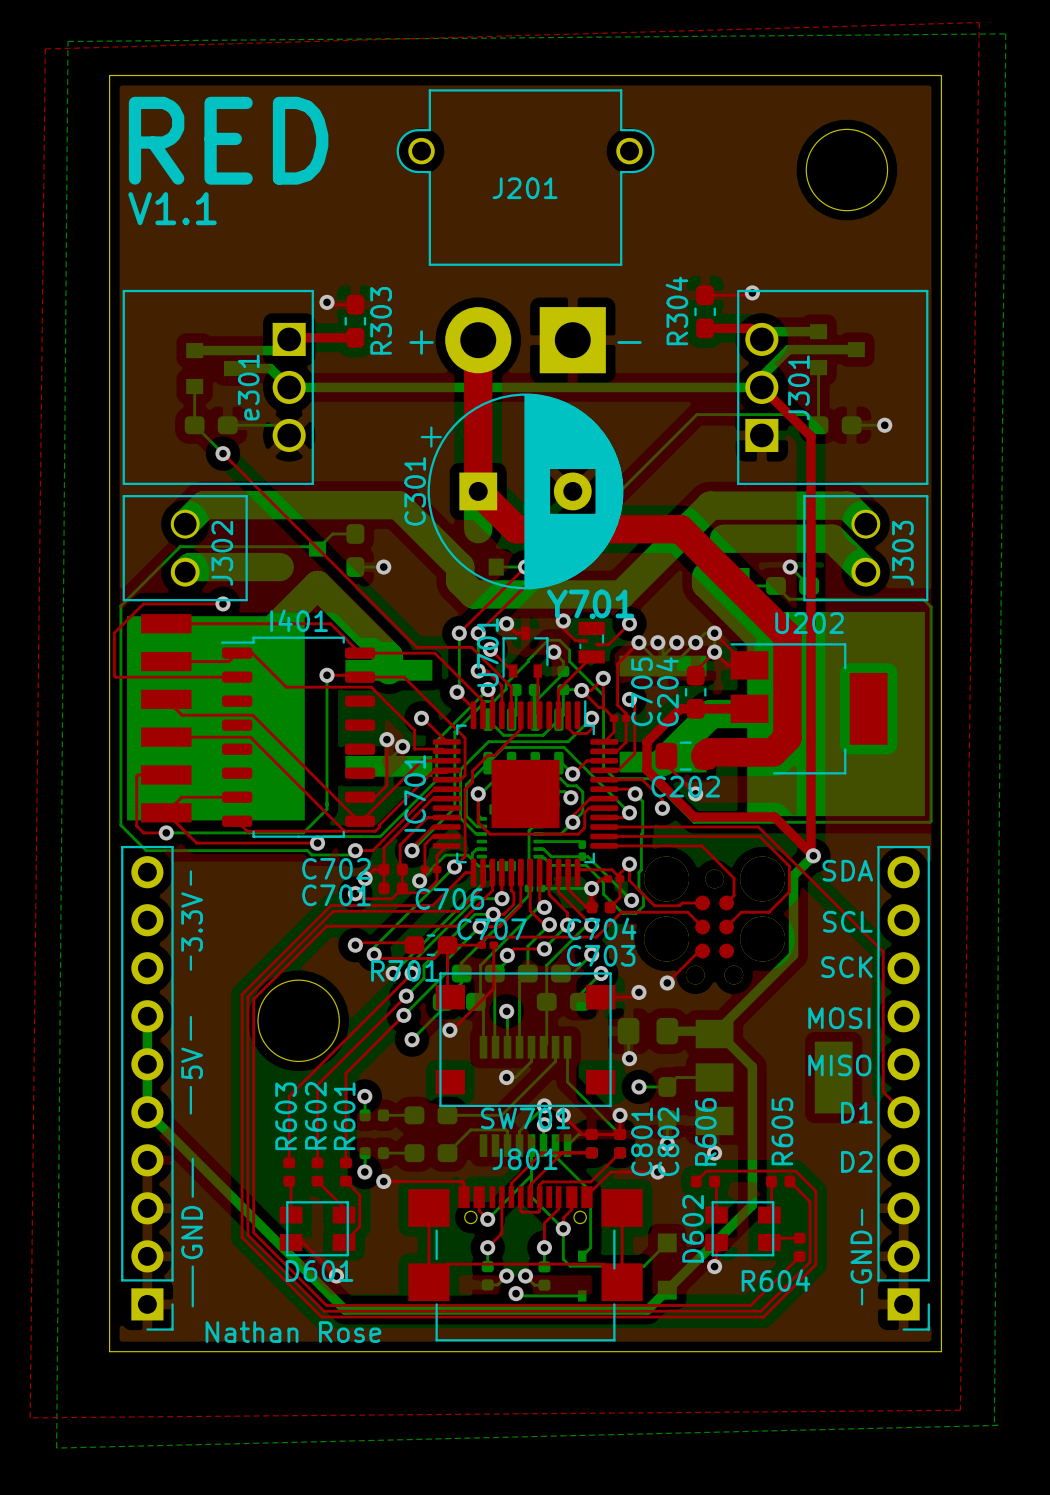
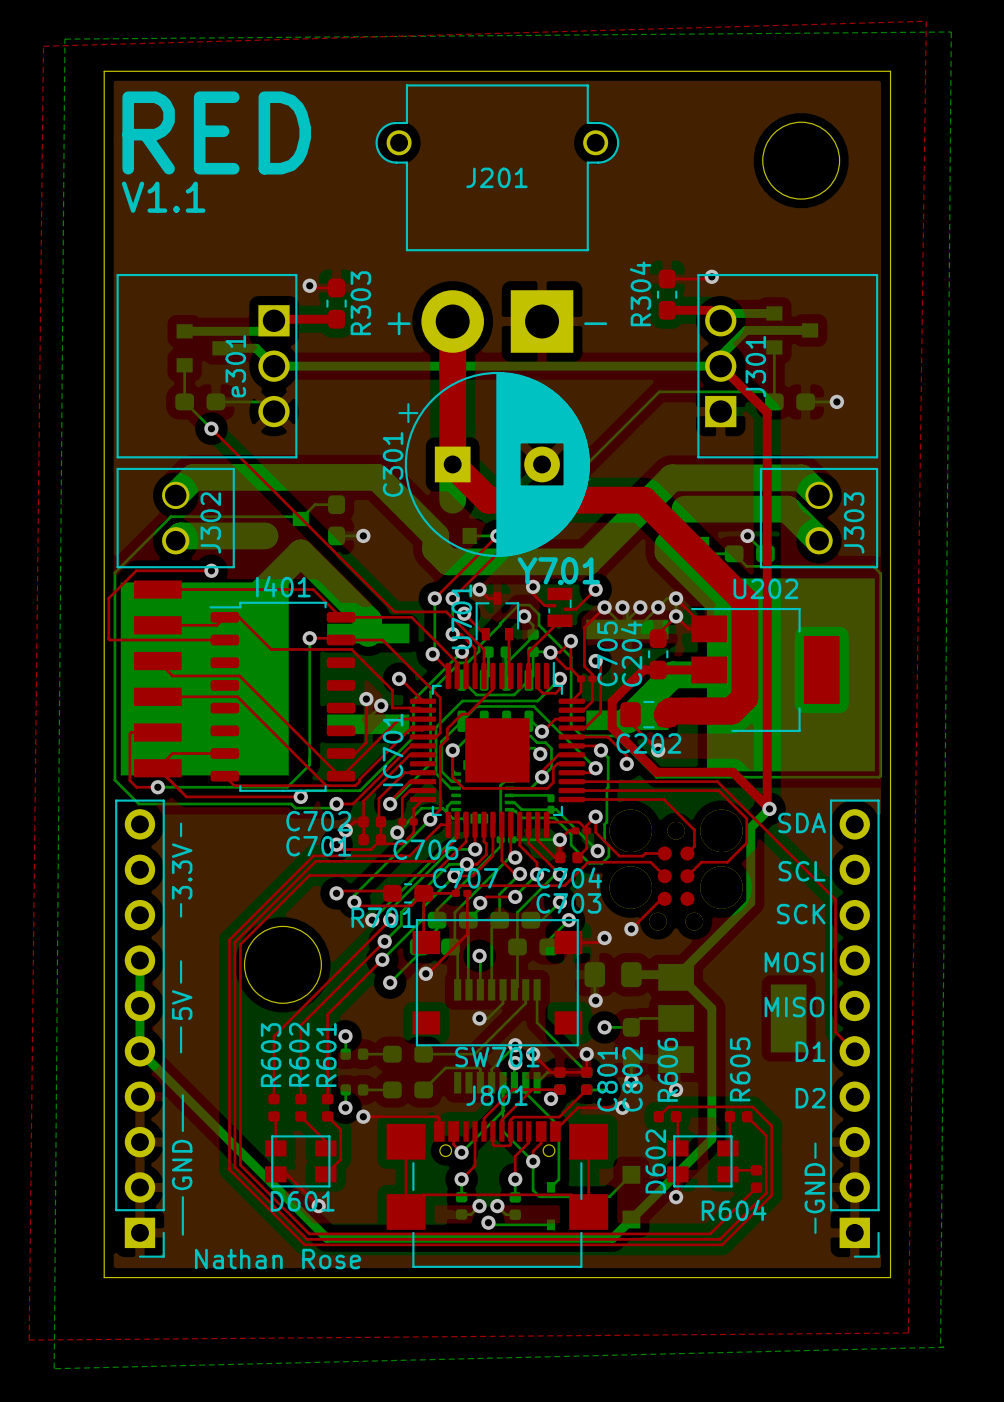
bottom track: none -> (586, 1089) (604, 1089)
via: none -> (550, 1098)

